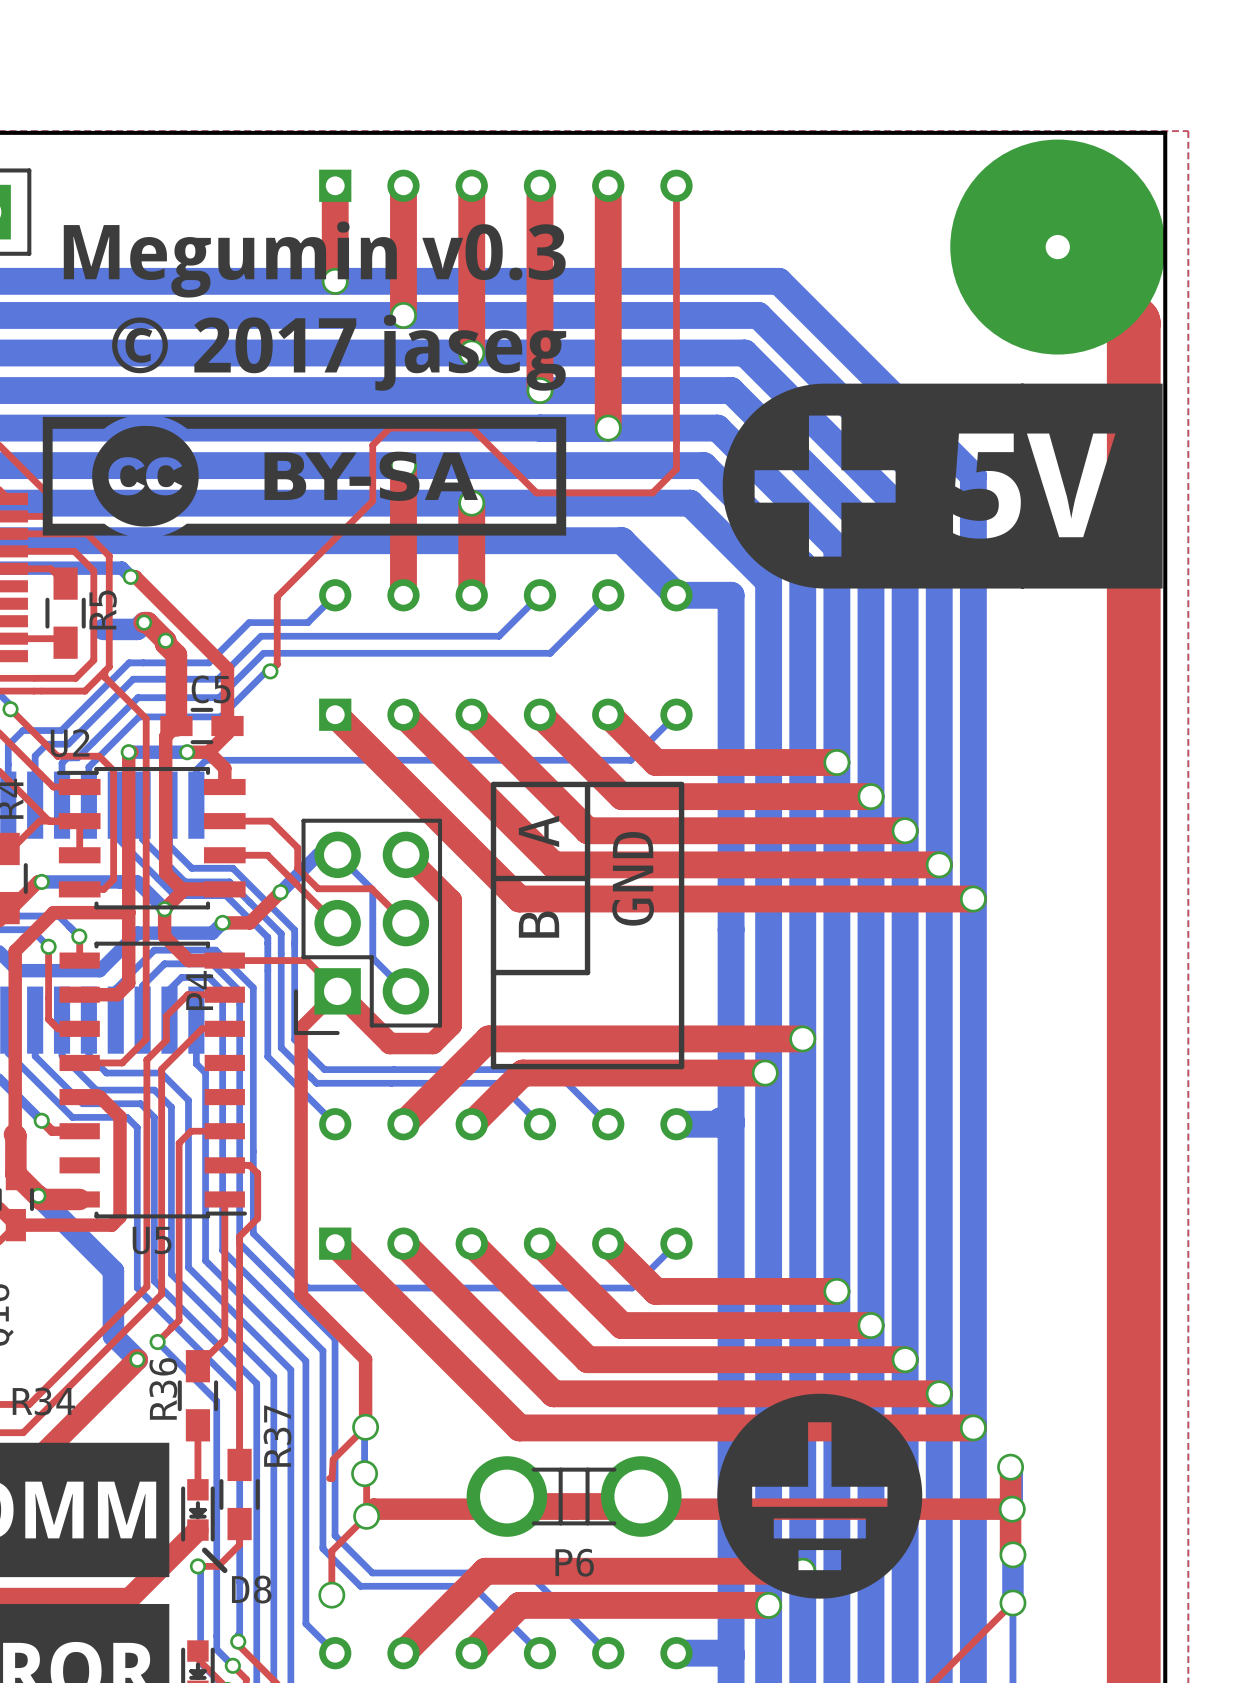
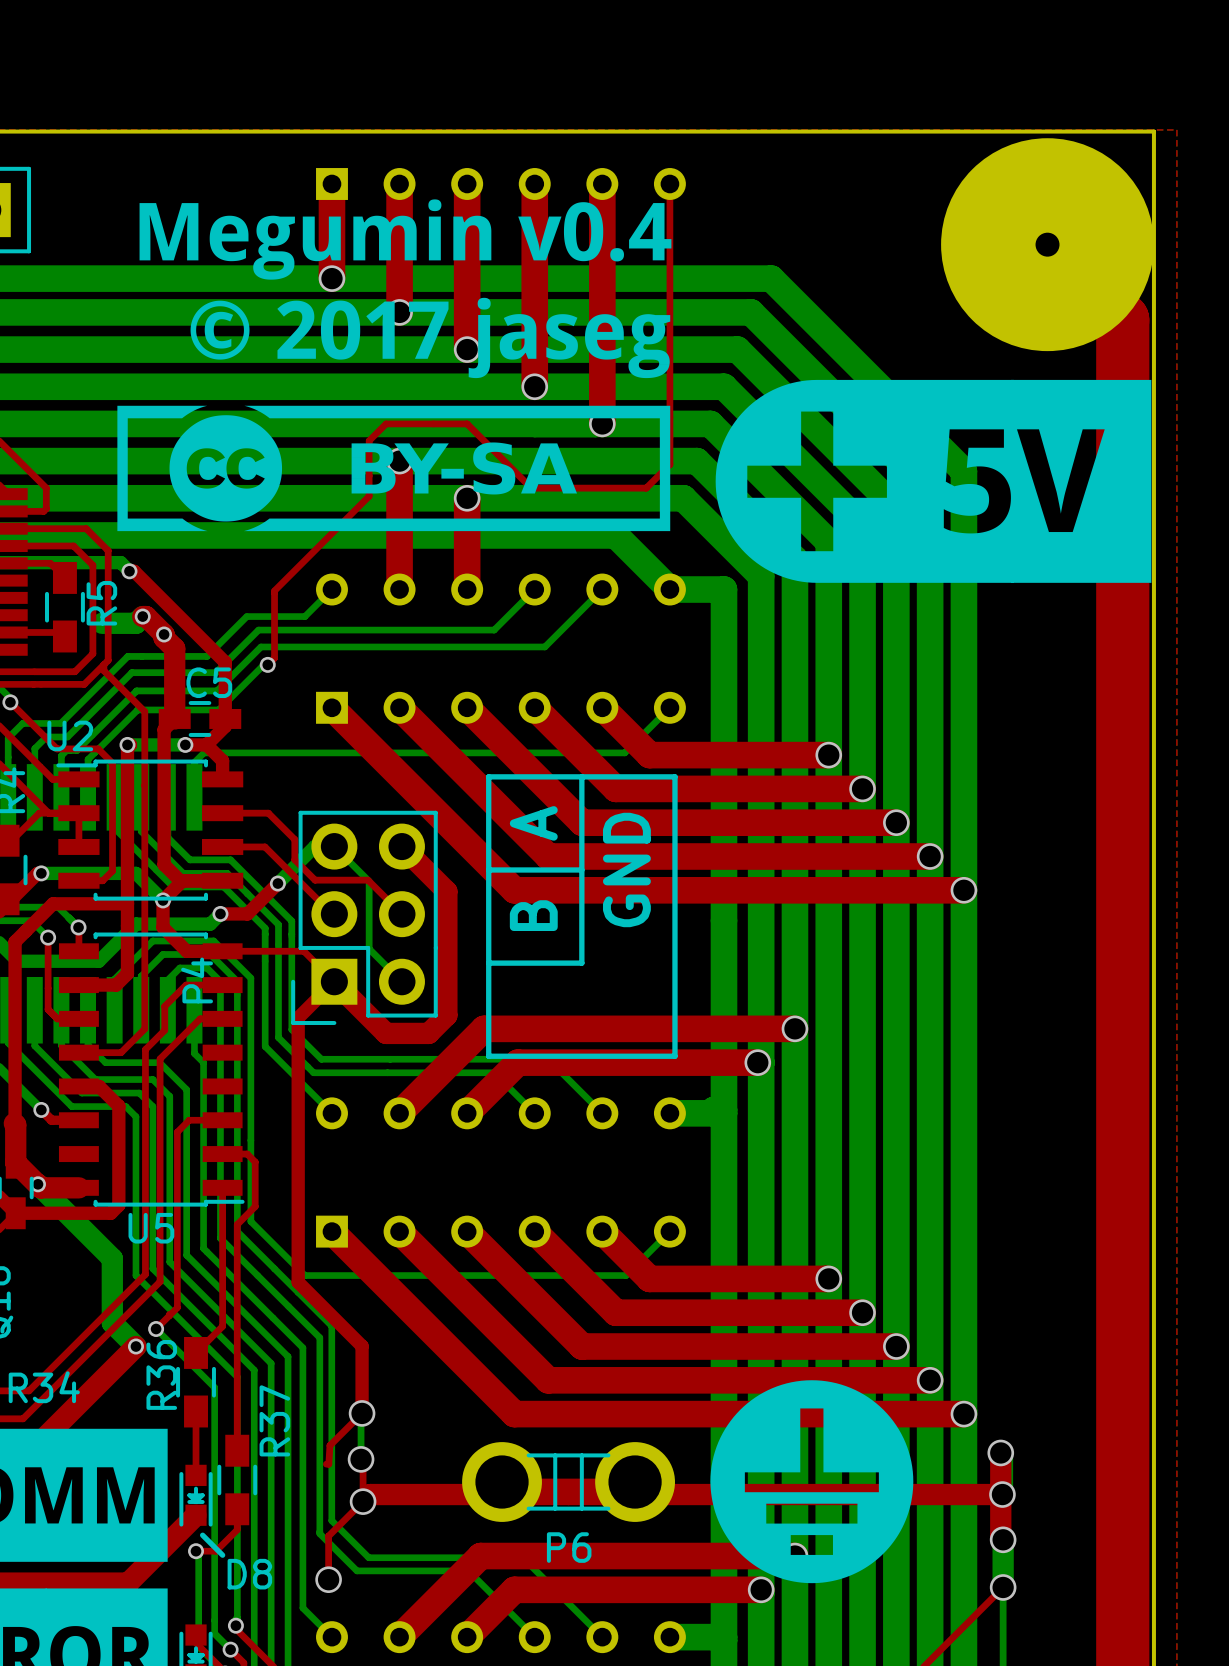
drawing: none -> [117, 199, 672, 532]
drawing: [42, 221, 567, 536] -> none

